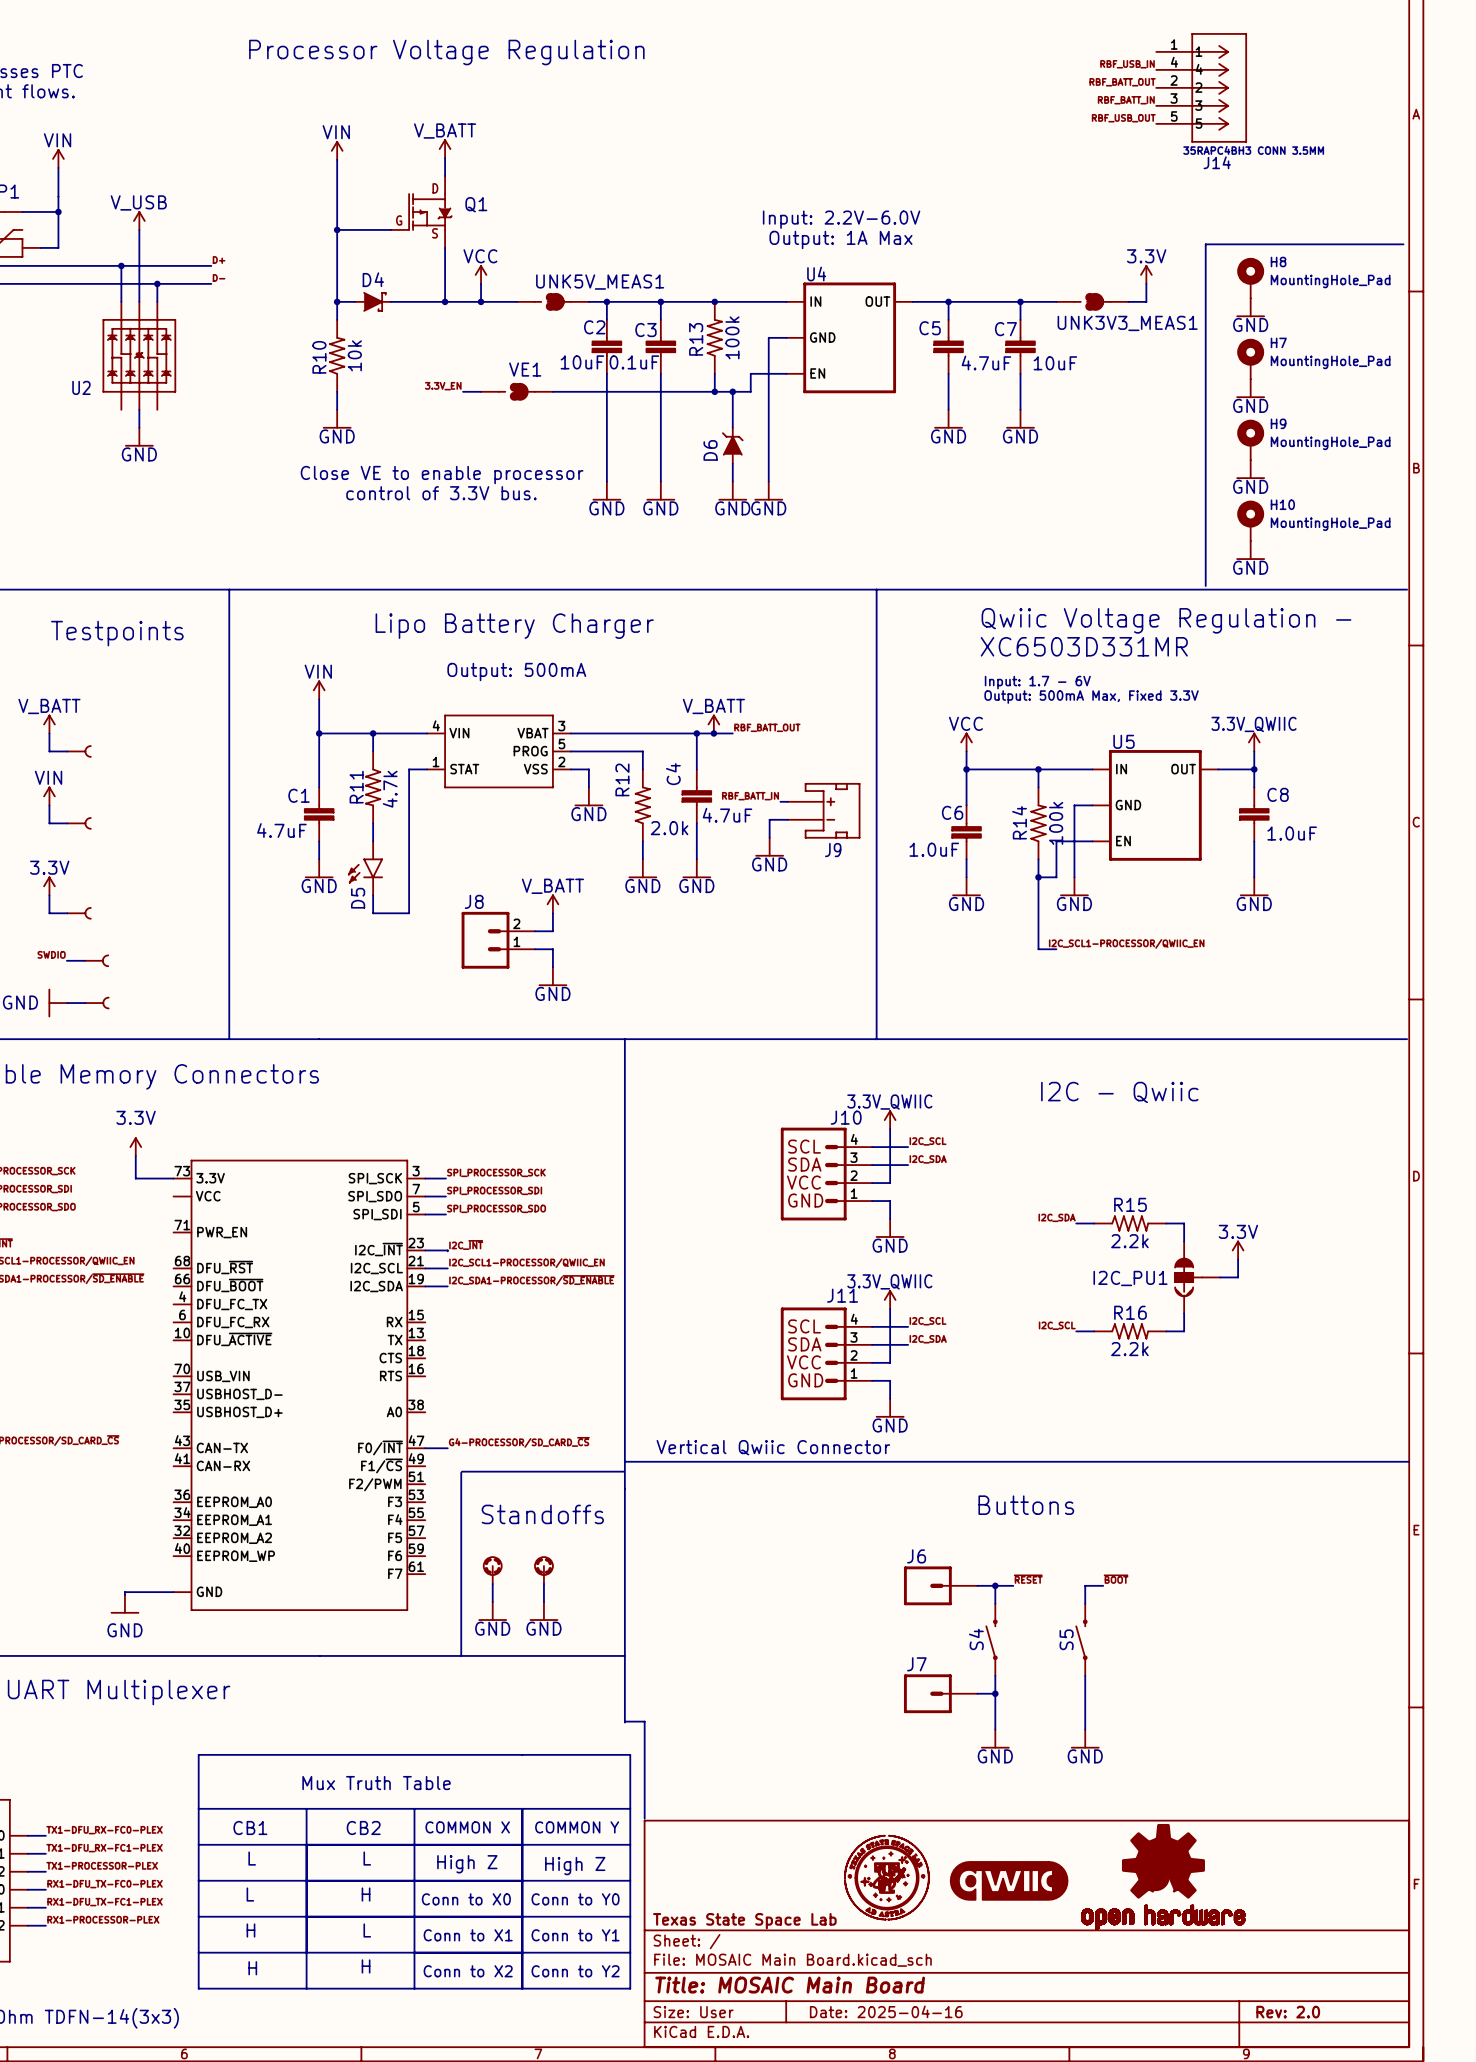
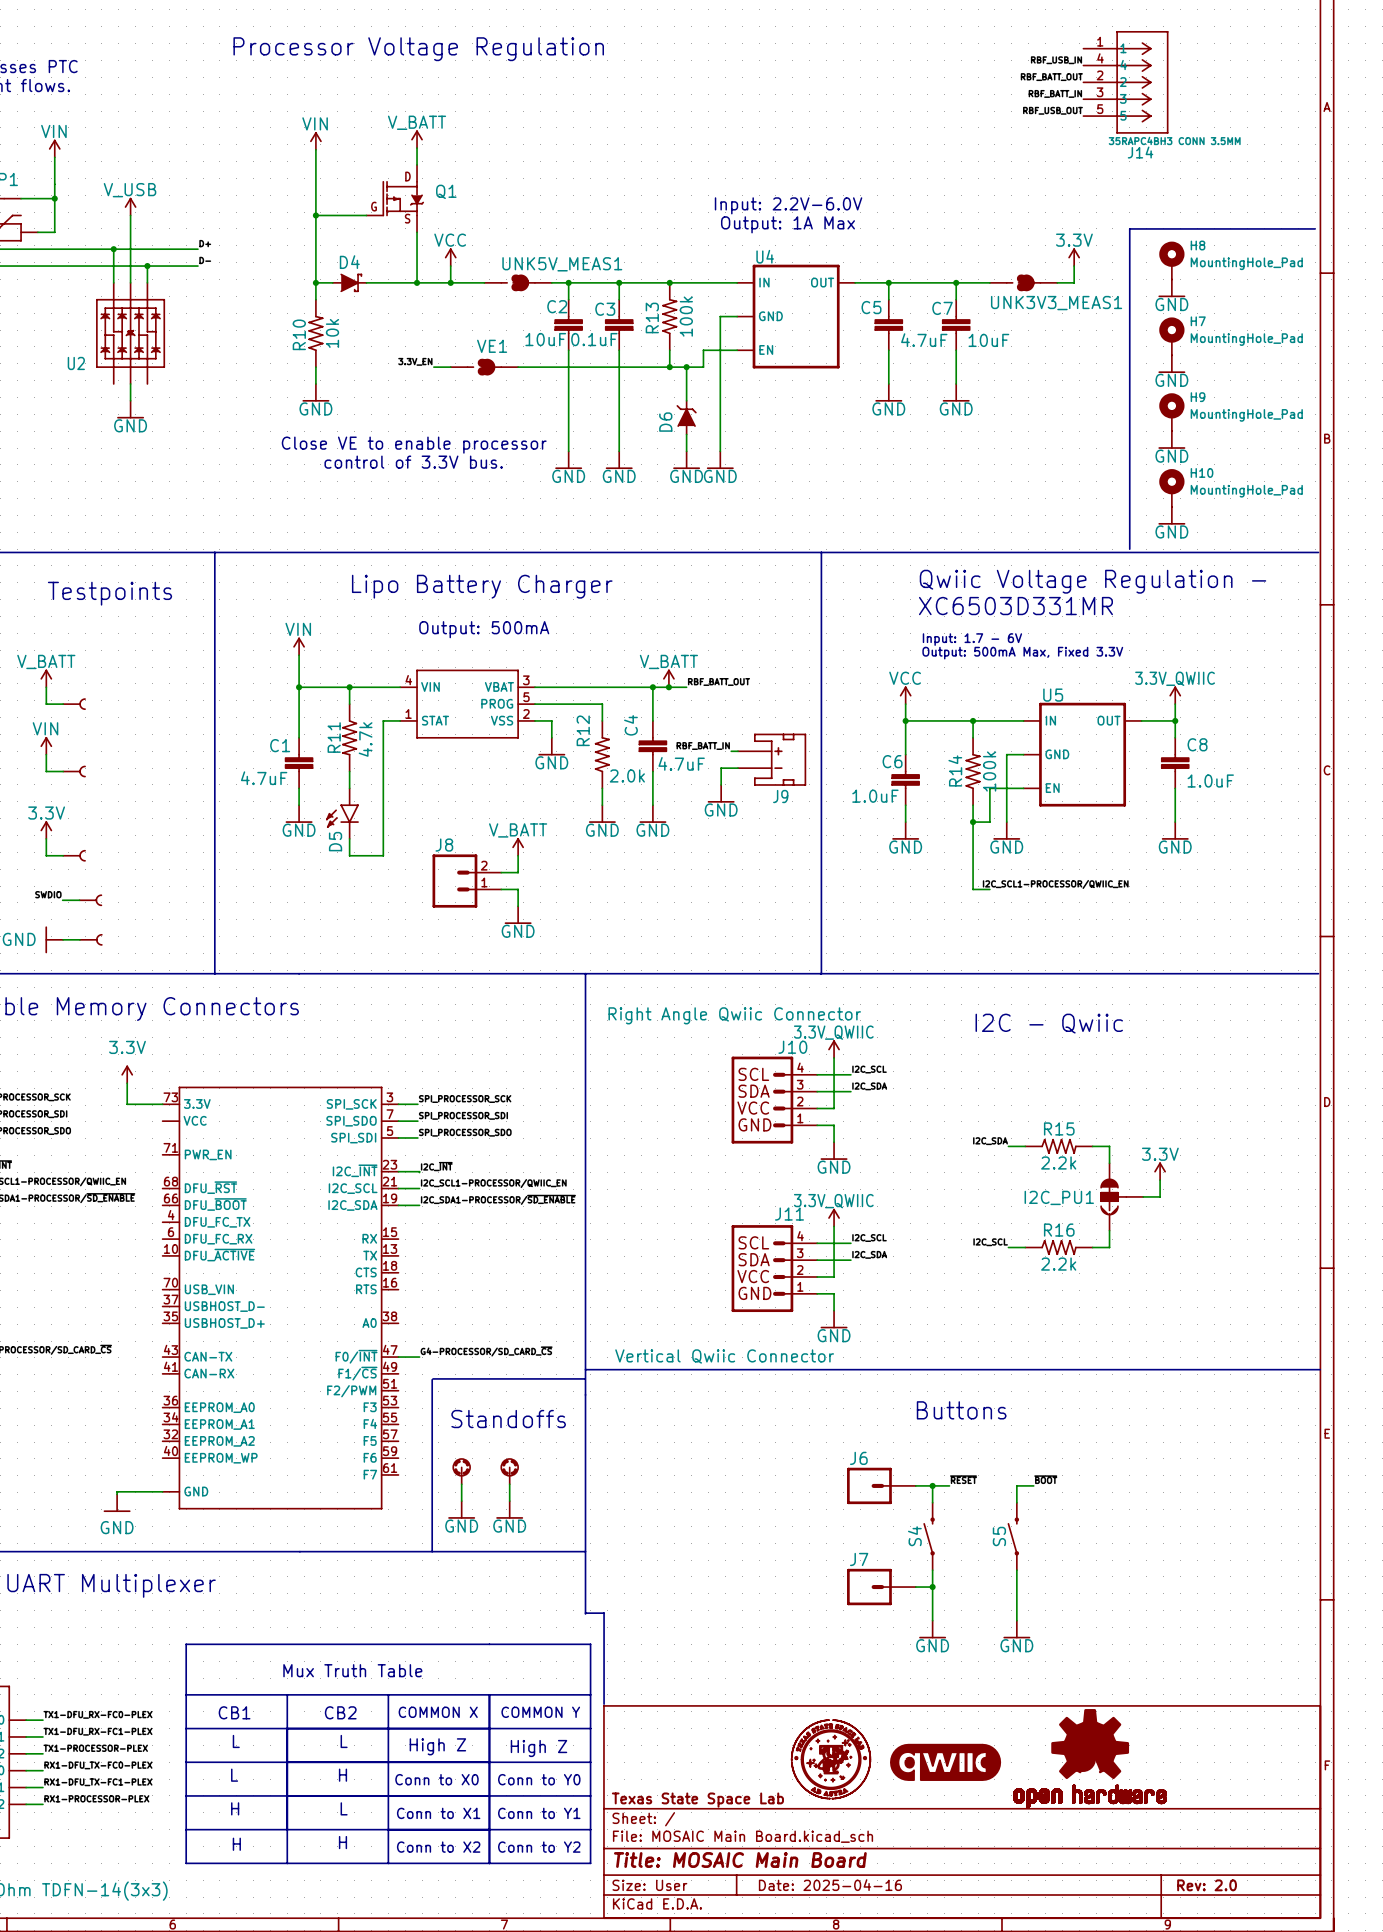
J10 value: none -> Right Angle Qwiic Connector (734, 1015)

